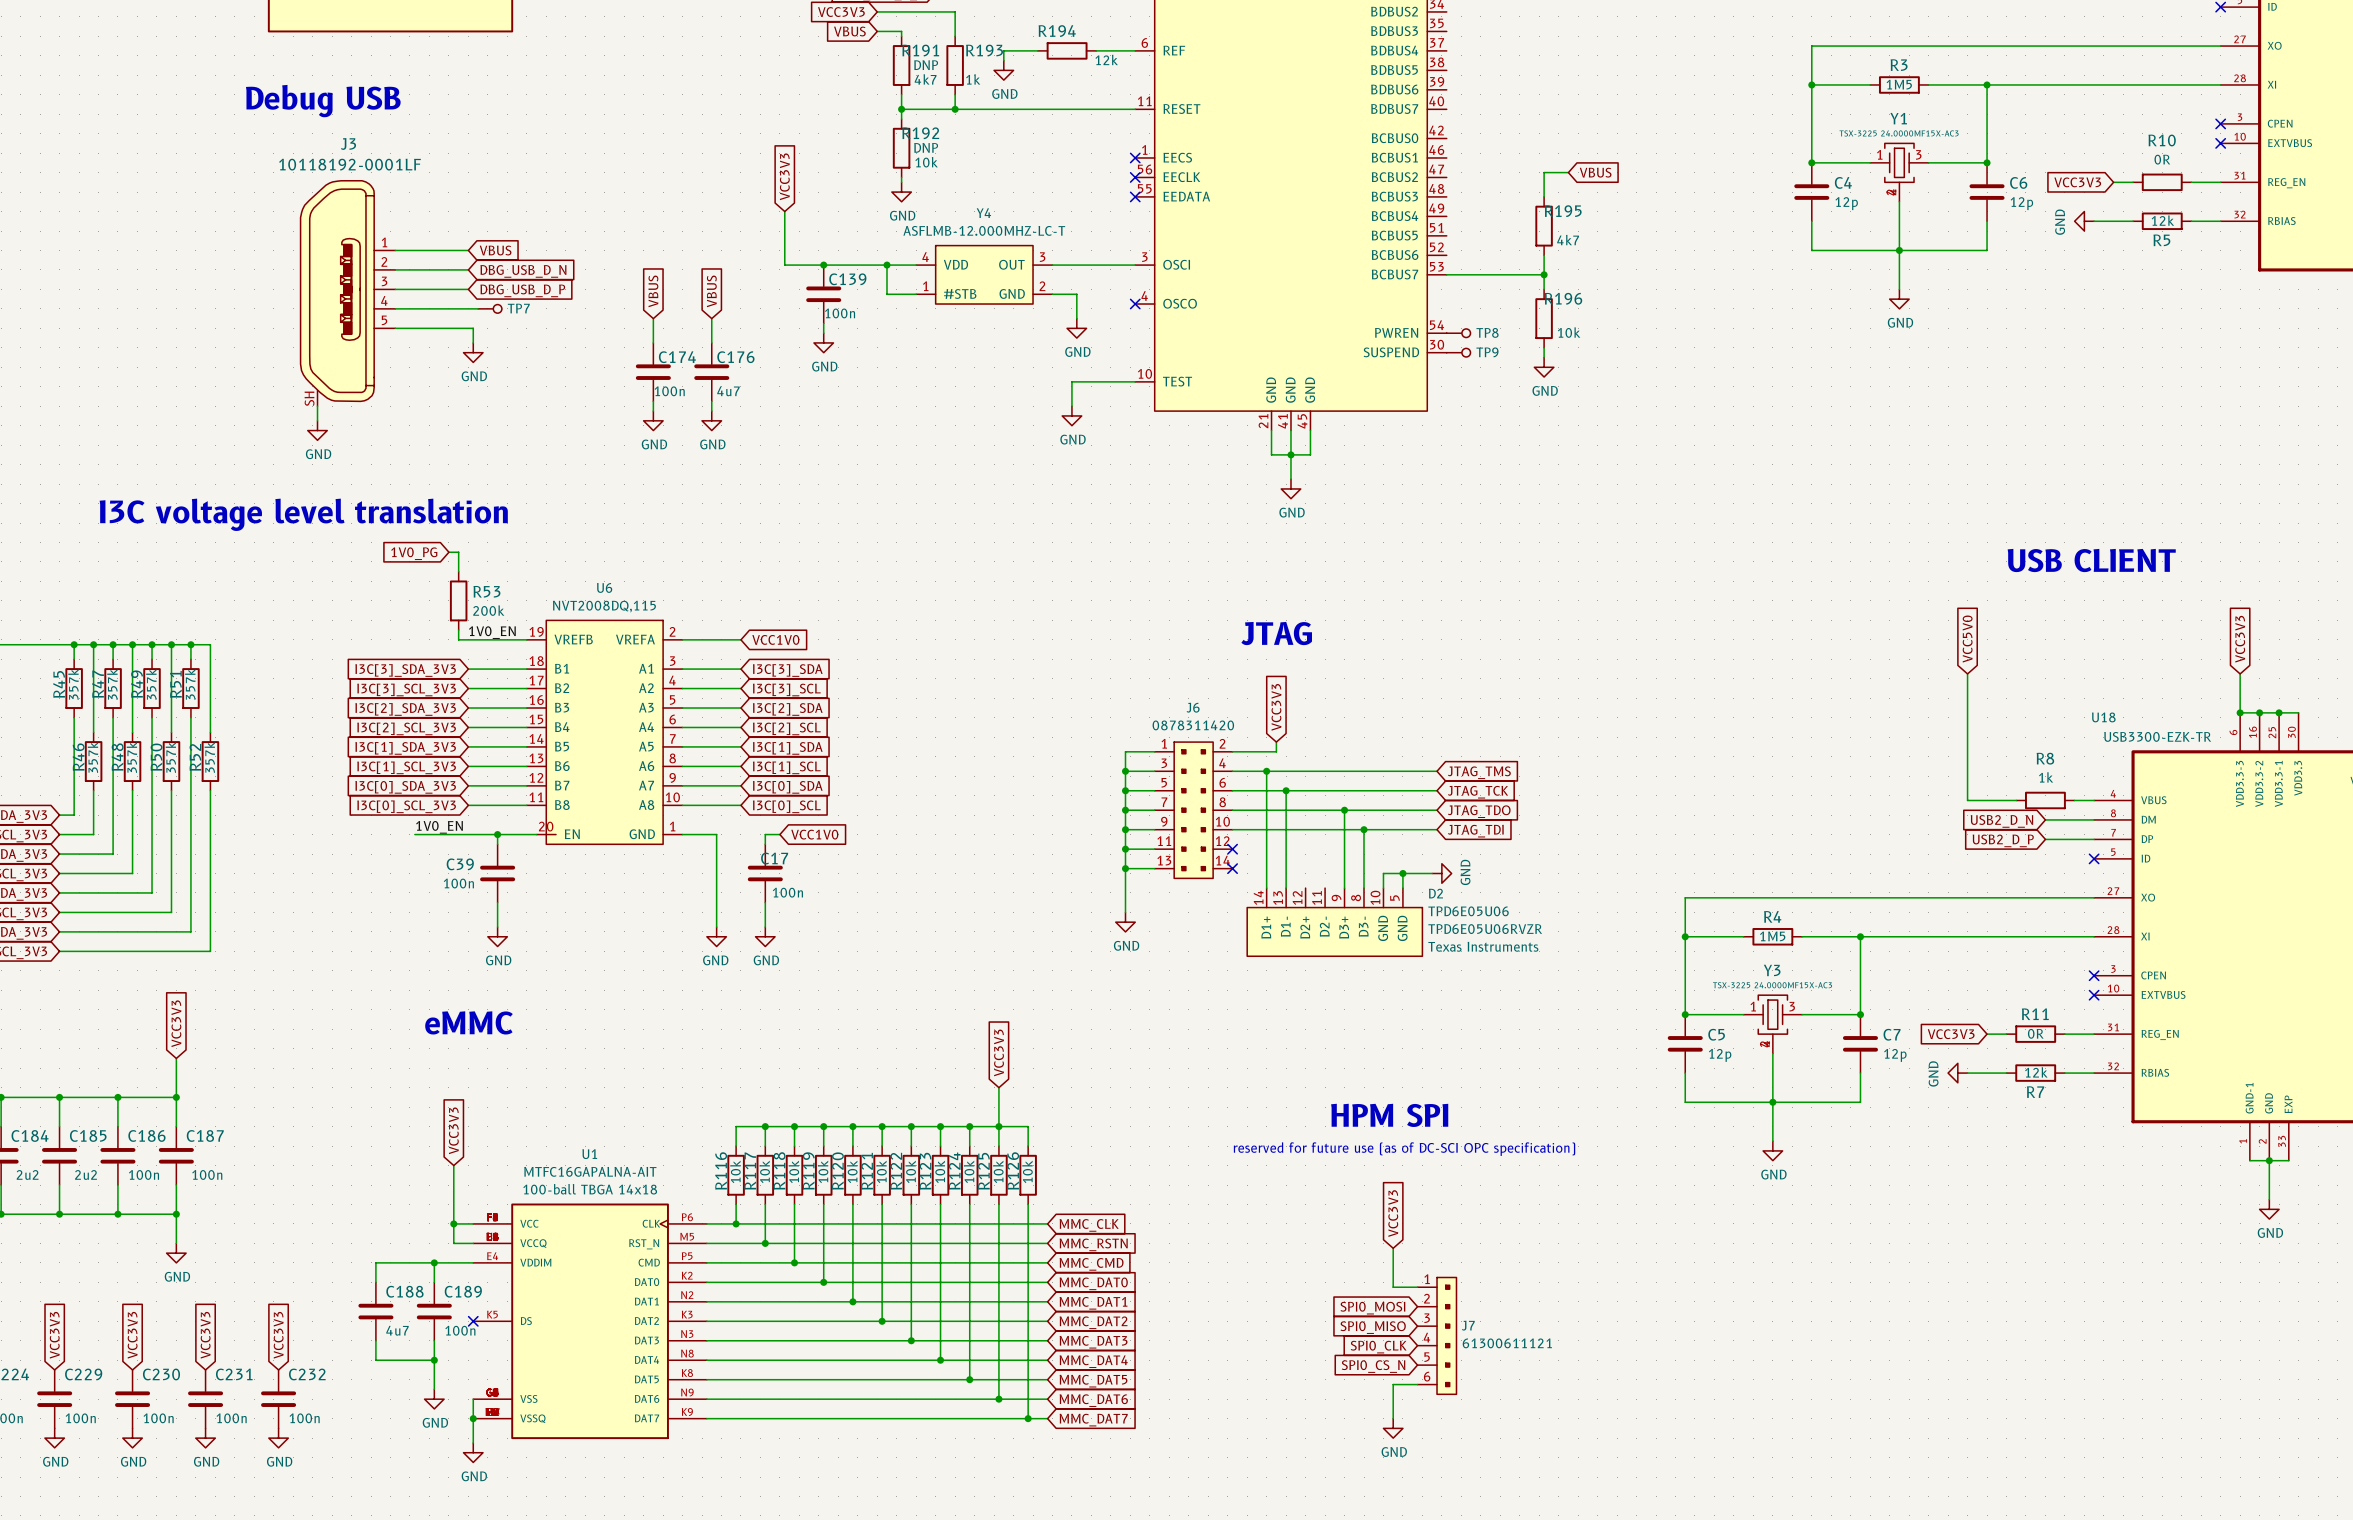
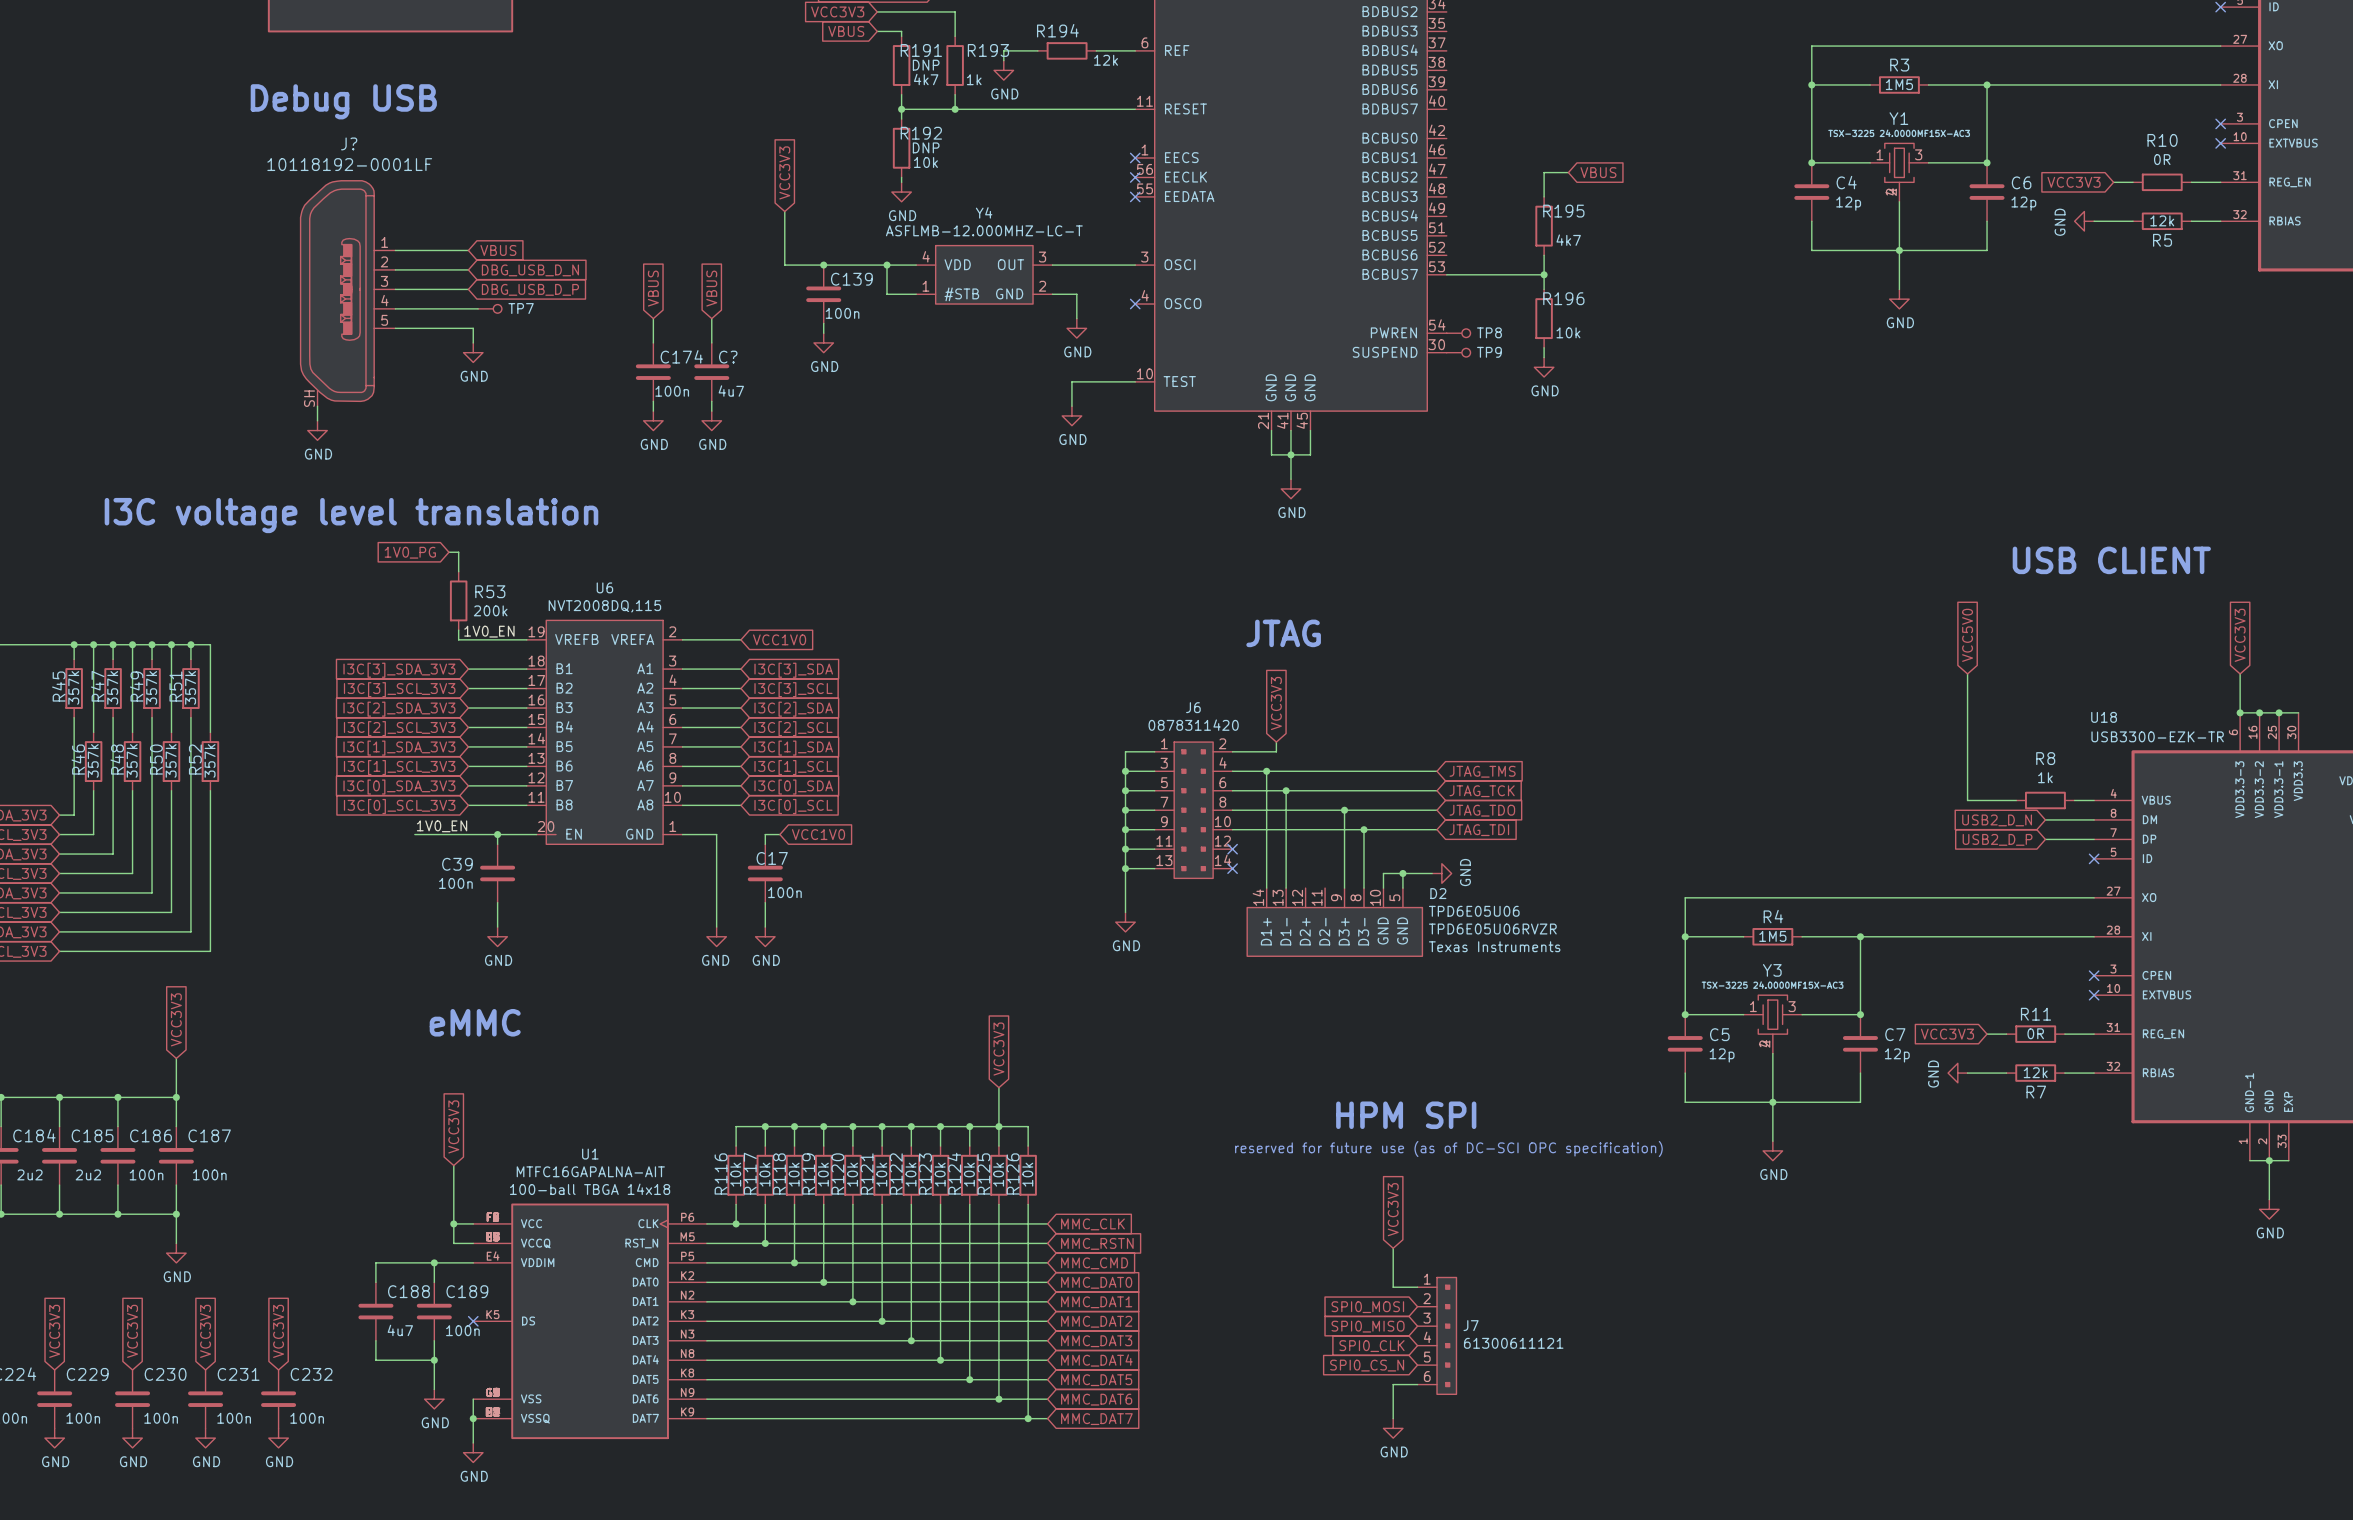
J3 name: J3 (348, 143) -> J? (349, 143)
C176 name: C176 (735, 357) -> C? (728, 357)

